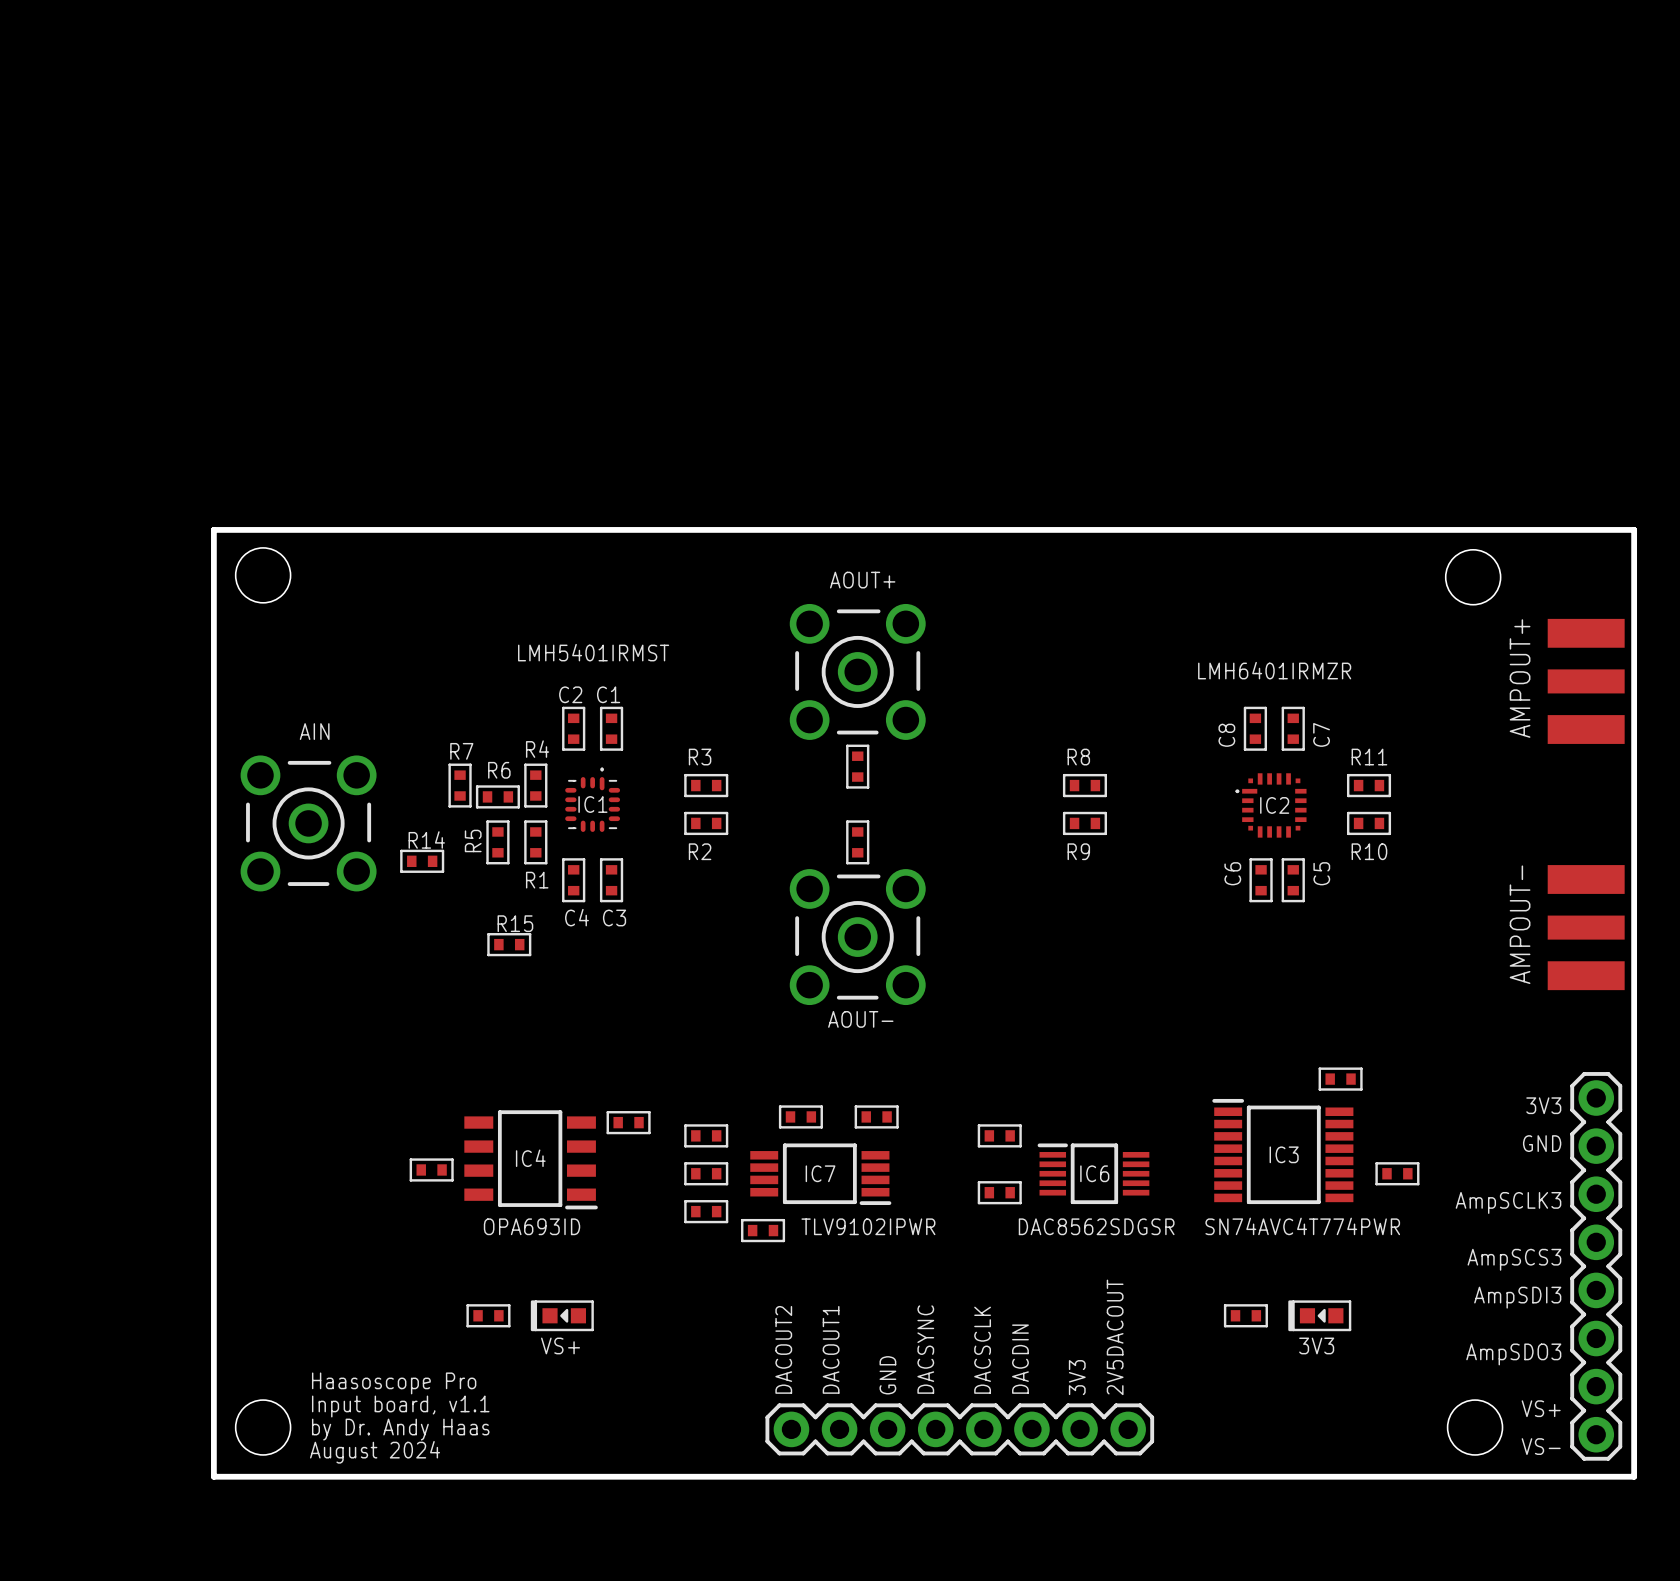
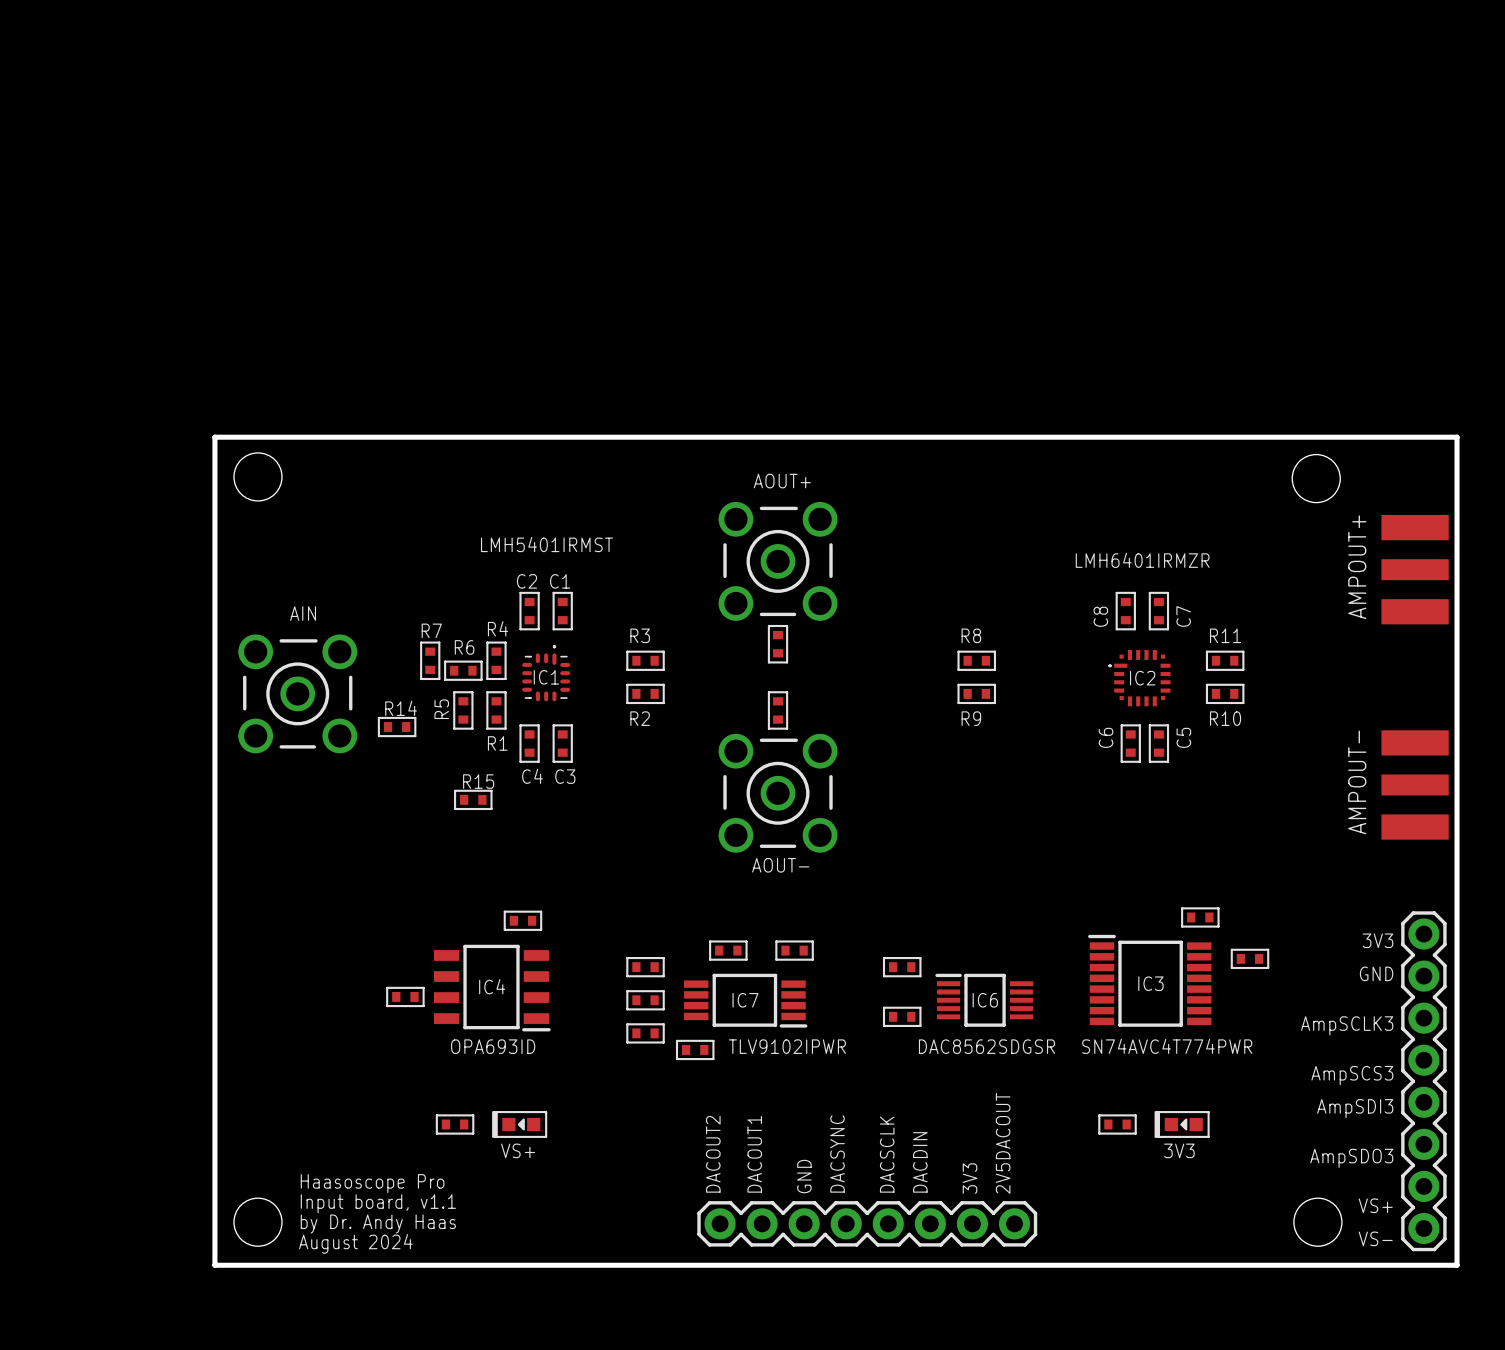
part position: (628, 1122) -> (522, 920)
part position: (1397, 1173) -> (1250, 958)

